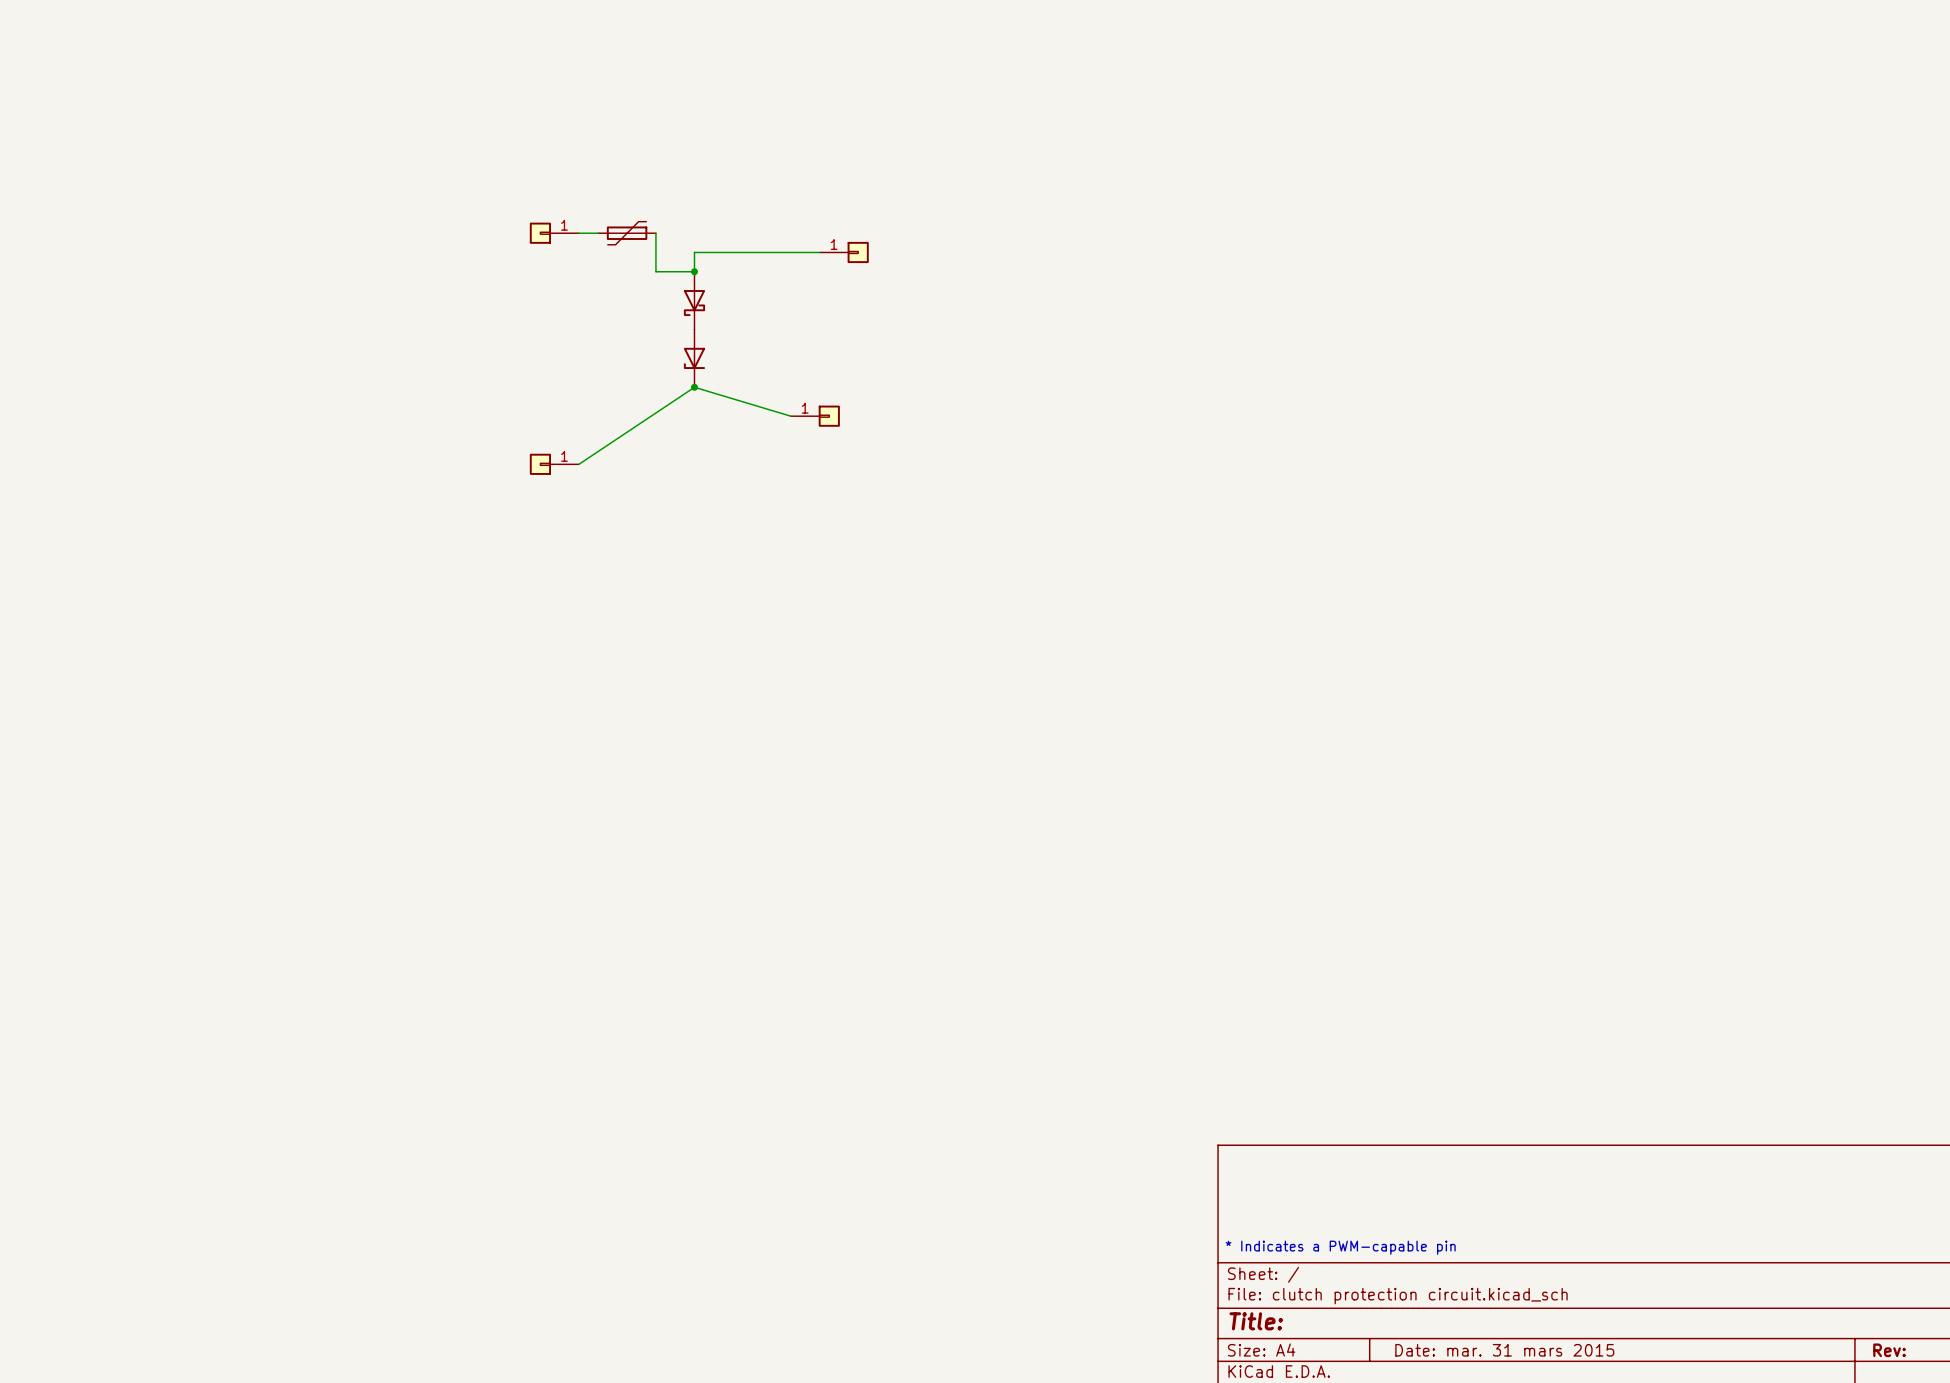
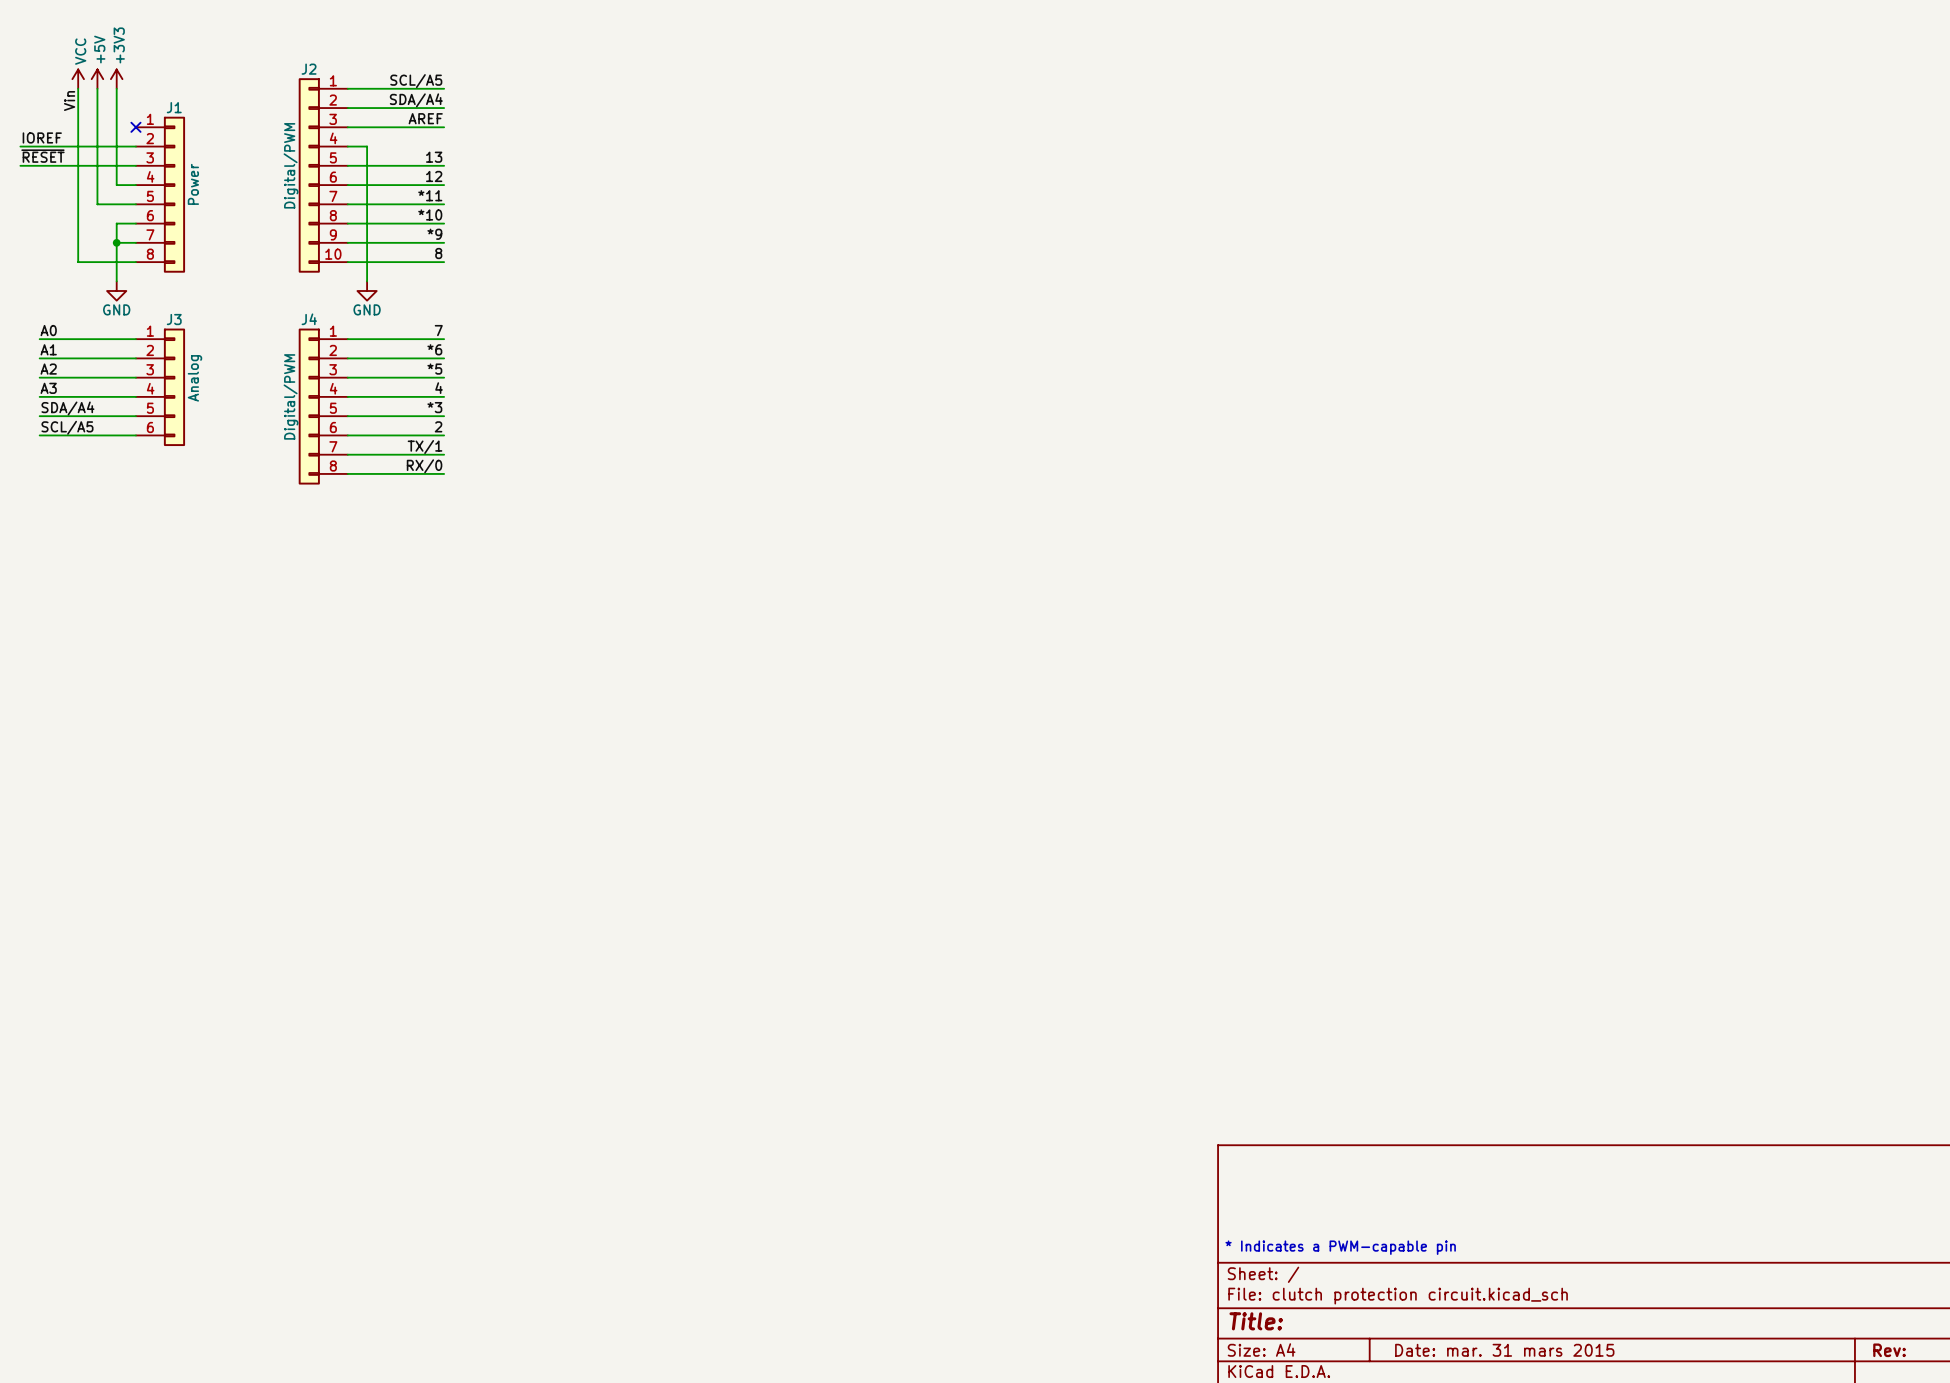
power symbol: none -> VCC (78, 79)
power symbol: none -> +5V (97, 79)
power symbol: none -> +3V3 (116, 79)
label: none -> SCL/A5 (416, 81)
wire: none -> (78, 88) (78, 262) (135, 262)
wire: none -> (97, 88) (97, 204) (135, 204)
wire: none -> (116, 88) (116, 185) (135, 185)
wire: none -> (347, 88) (444, 88)
label: none -> SDA/A4 (416, 100)
label: none -> Vin (69, 101)
wire: none -> (347, 108) (444, 108)
label: none -> AREF (425, 118)
no-connect mark: none -> (135, 127)
wire: none -> (347, 127) (444, 127)
label: none -> IOREF (42, 137)
wire: none -> (20, 146) (135, 146)
wire: none -> (347, 146) (367, 146) (367, 281)
label: none -> ~{RESET} (42, 156)
label: none -> 13 (434, 157)
wire: none -> (20, 165) (135, 165)
wire: none -> (347, 165) (444, 165)
J2: none -> Digital/PWM (323, 175)
label: none -> 12 (434, 176)
wire: none -> (347, 185) (444, 185)
J1: none -> Power (160, 194)
label: none -> *11 (430, 195)
wire: none -> (347, 204) (444, 204)
label: none -> *10 (430, 215)
wire: none -> (135, 223) (116, 223) (116, 281)
wire: none -> (347, 223) (444, 223)
part: (554, 233) -> none
wire: (578, 233) (598, 233) -> none
part: (627, 233) -> none
wire: (655, 233) (655, 271) (694, 271) (694, 252) (819, 252) -> none
label: none -> *9 (434, 234)
wire: none -> (116, 242) (135, 242)
junction: none -> (116, 242)
wire: none -> (347, 242) (444, 242)
part: (844, 252) -> none
label: none -> 8 (438, 253)
wire: none -> (347, 262) (444, 262)
junction: (694, 271) -> none
power symbol: none -> GND (116, 291)
power symbol: none -> GND (367, 291)
part: (694, 300) -> none
label: none -> A0 (48, 330)
label: none -> 7 (438, 330)
wire: none -> (39, 339) (135, 339)
wire: none -> (347, 339) (444, 339)
label: none -> A1 (48, 349)
label: none -> *6 (434, 349)
wire: none -> (39, 358) (135, 358)
wire: none -> (347, 358) (444, 358)
part: (694, 358) -> none
label: none -> A2 (48, 369)
label: none -> *5 (434, 369)
wire: none -> (39, 377) (135, 377)
wire: none -> (347, 377) (444, 377)
J3: none -> Analog (160, 387)
junction: (694, 387) -> none
label: none -> A3 (48, 388)
label: none -> 4 (438, 388)
wire: none -> (39, 396) (135, 396)
wire: none -> (347, 396) (444, 396)
J4: none -> Digital/PWM (323, 406)
label: none -> *3 (434, 407)
label: none -> SDA/A4 (67, 408)
wire: none -> (39, 416) (135, 416)
wire: none -> (347, 416) (444, 416)
wire: (790, 416) (694, 387) (578, 464) -> none
part: (815, 416) -> none
label: none -> 2 (438, 426)
label: none -> SCL/A5 (67, 427)
wire: none -> (39, 435) (135, 435)
wire: none -> (347, 435) (444, 435)
label: none -> TX/1 (425, 447)
wire: none -> (347, 454) (444, 454)
part: (554, 464) -> none
label: none -> RX/0 (424, 466)
wire: none -> (347, 473) (444, 473)

